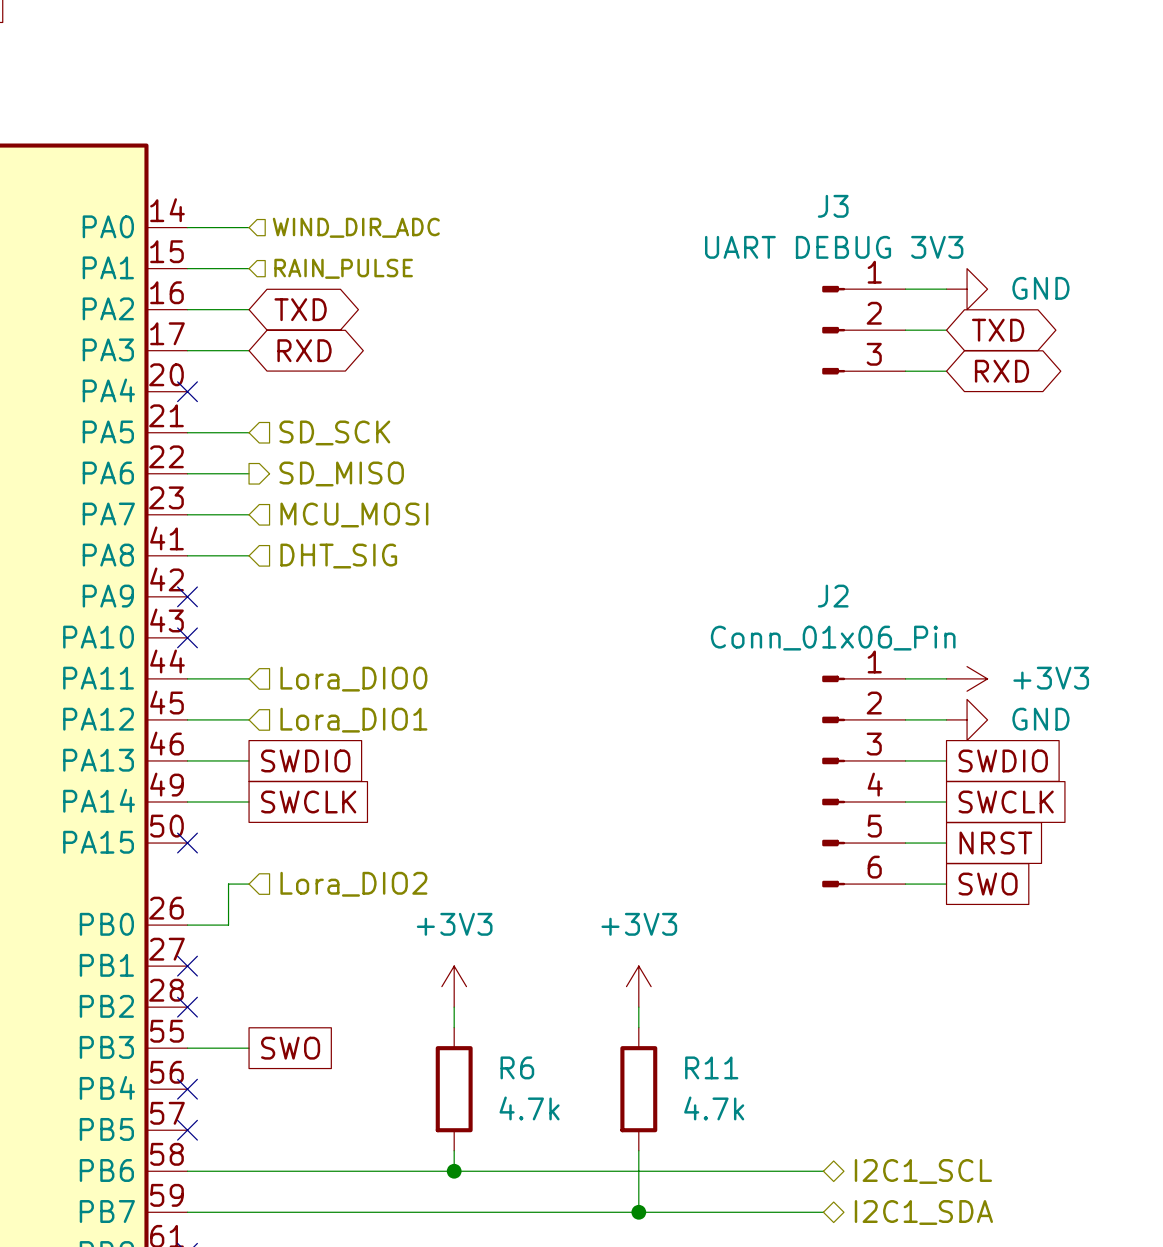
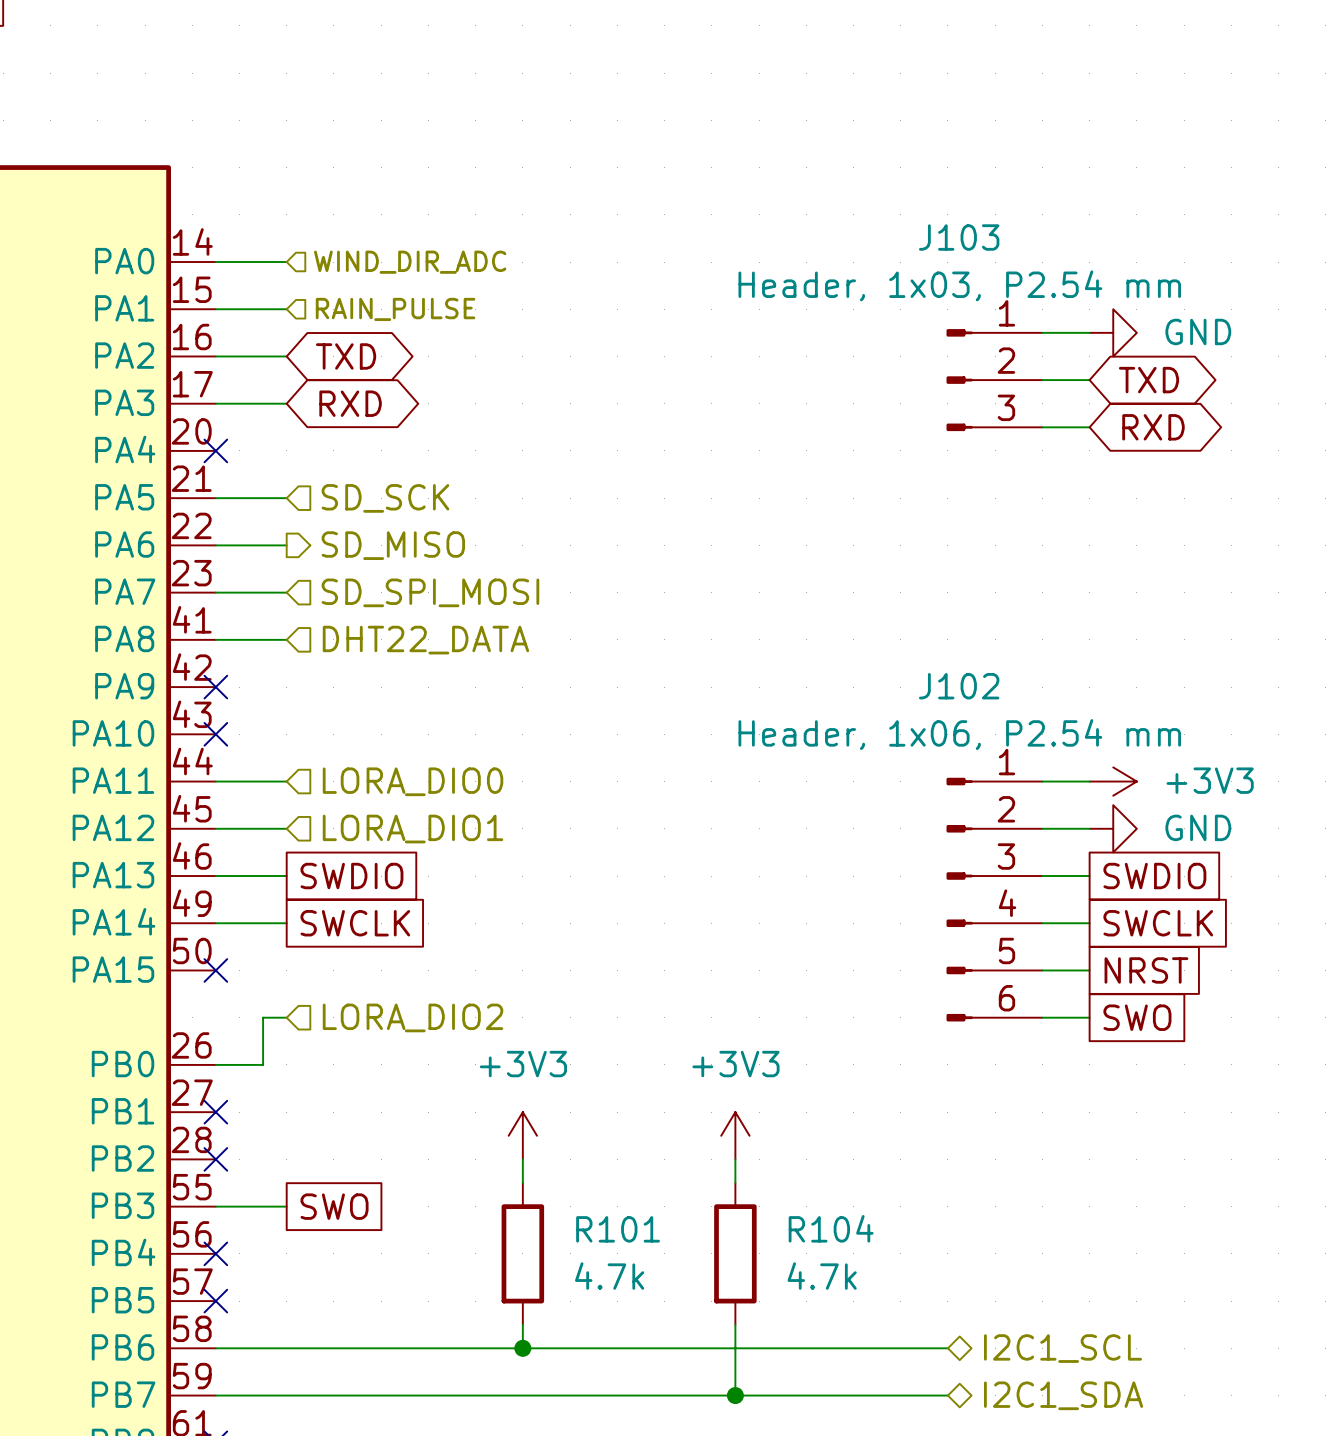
J3 name: J3 (833, 206) -> J103 (959, 237)
J3 value: UART DEBUG 3V3 (834, 247) -> Header, 1x03, P2.54 mm (959, 285)
hierarchical label: MCU_MOSI (354, 515) -> SD_SPI_MOSI (430, 592)
hierarchical label: DHT_SIG (338, 556) -> DHT22_DATA (425, 640)
J2 name: J2 (833, 596) -> J102 (959, 686)
J2 value: Conn_01x06_Pin (833, 638) -> Header, 1x06, P2.54 mm (959, 734)
hierarchical label: Lora_DIO0 (353, 679) -> LORA_DIO0 (413, 781)
hierarchical label: Lora_DIO1 (353, 720) -> LORA_DIO1 (413, 829)
hierarchical label: Lora_DIO2 (353, 884) -> LORA_DIO2 (413, 1017)
R6 name: R6 (517, 1067) -> R101 (618, 1229)
R11 name: R11 (711, 1067) -> R104 (831, 1228)

